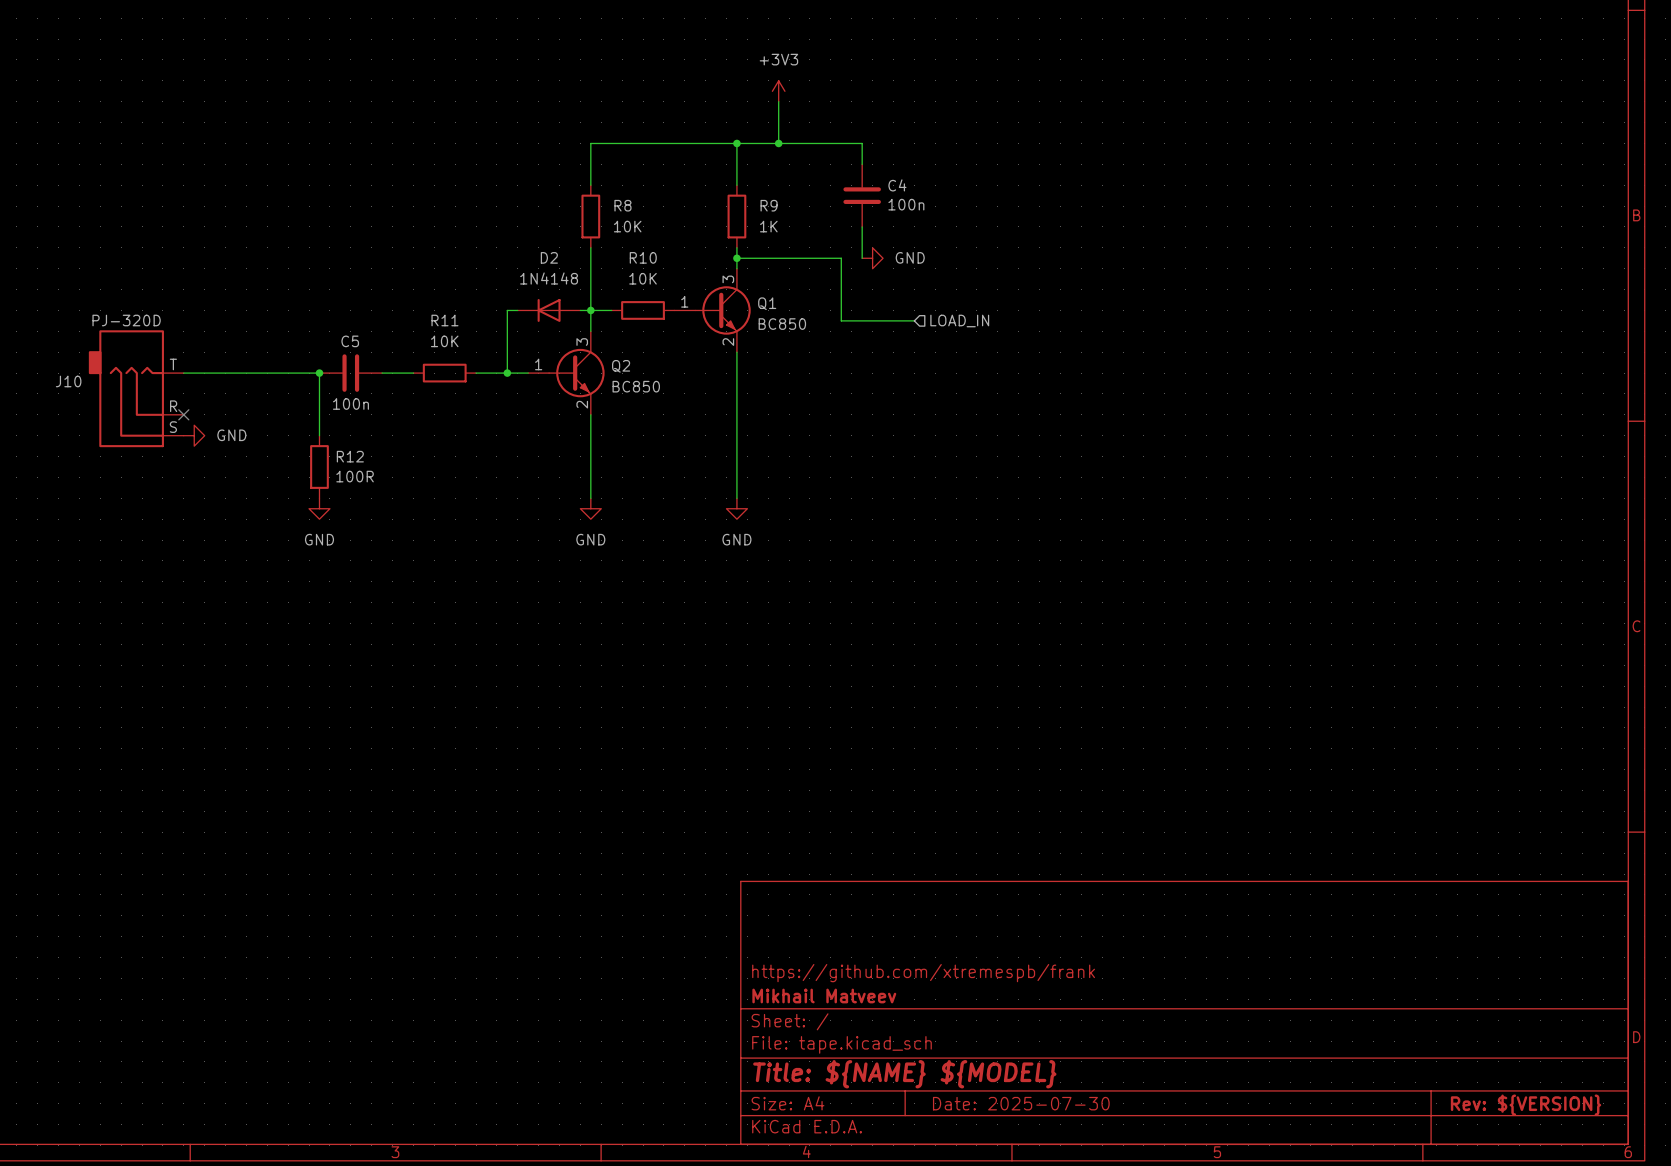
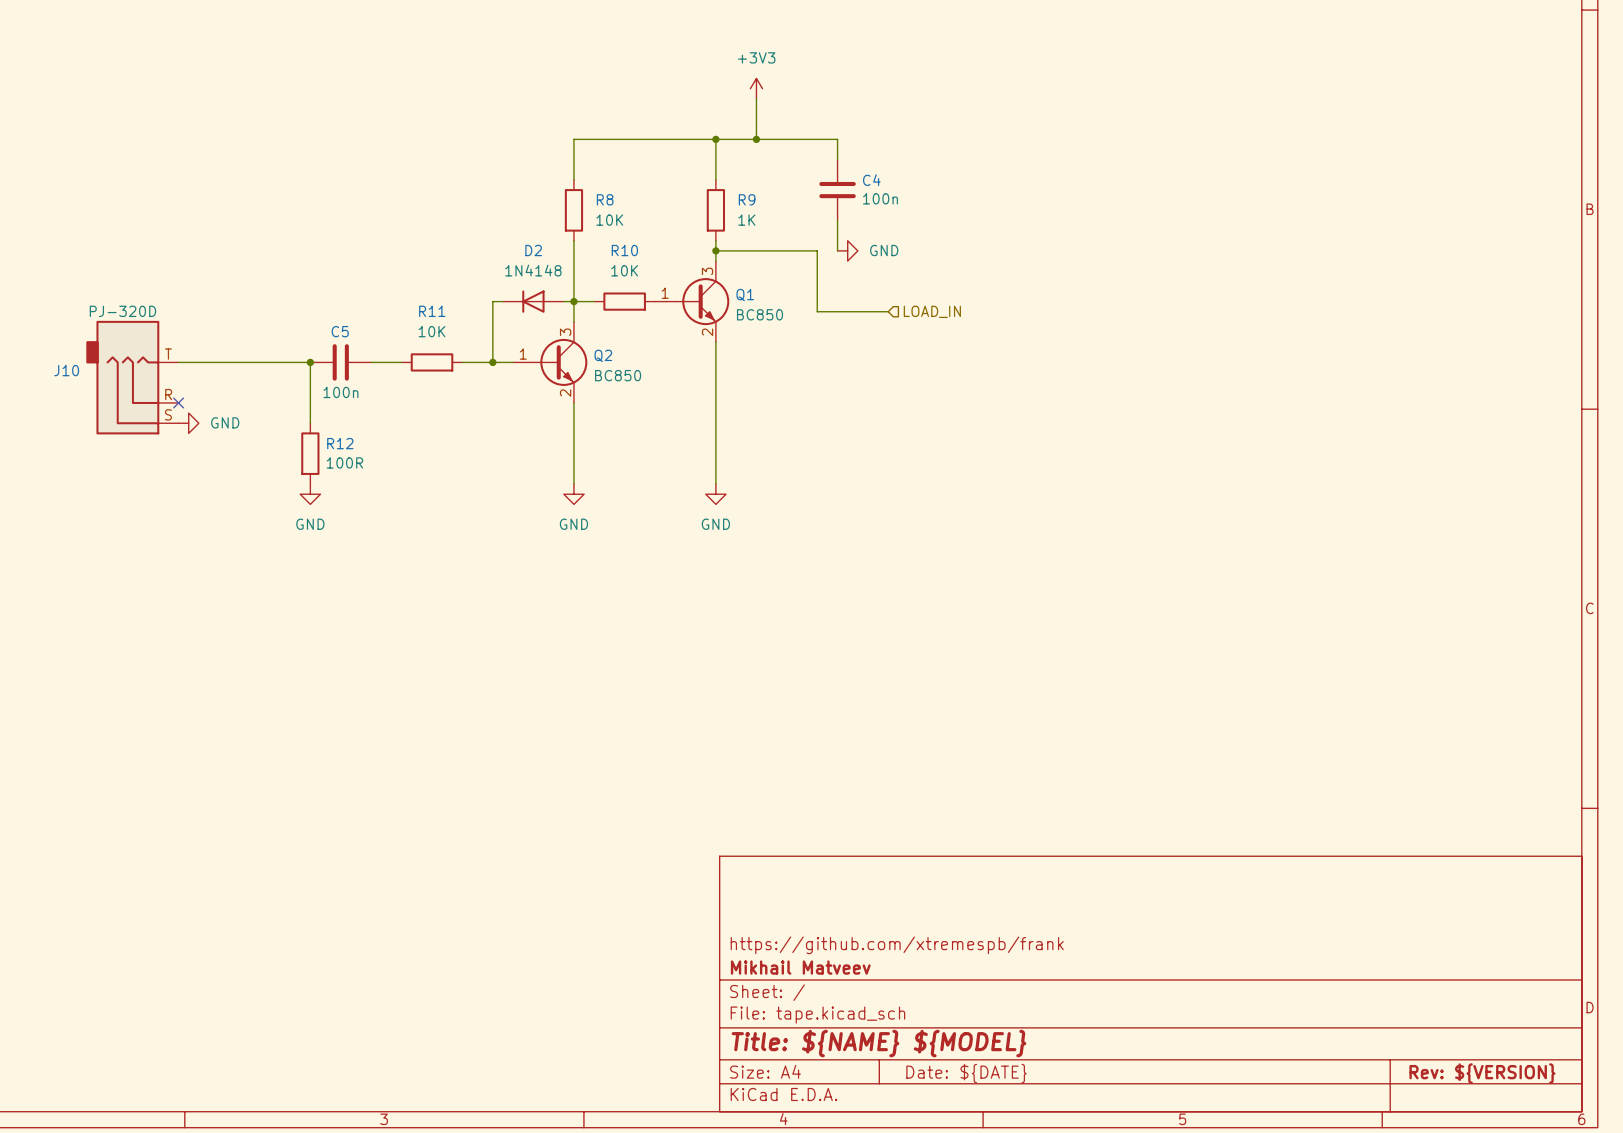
title block: Date: 2025-07-30 (1021, 1103) -> Date: ${DATE} (966, 1073)

